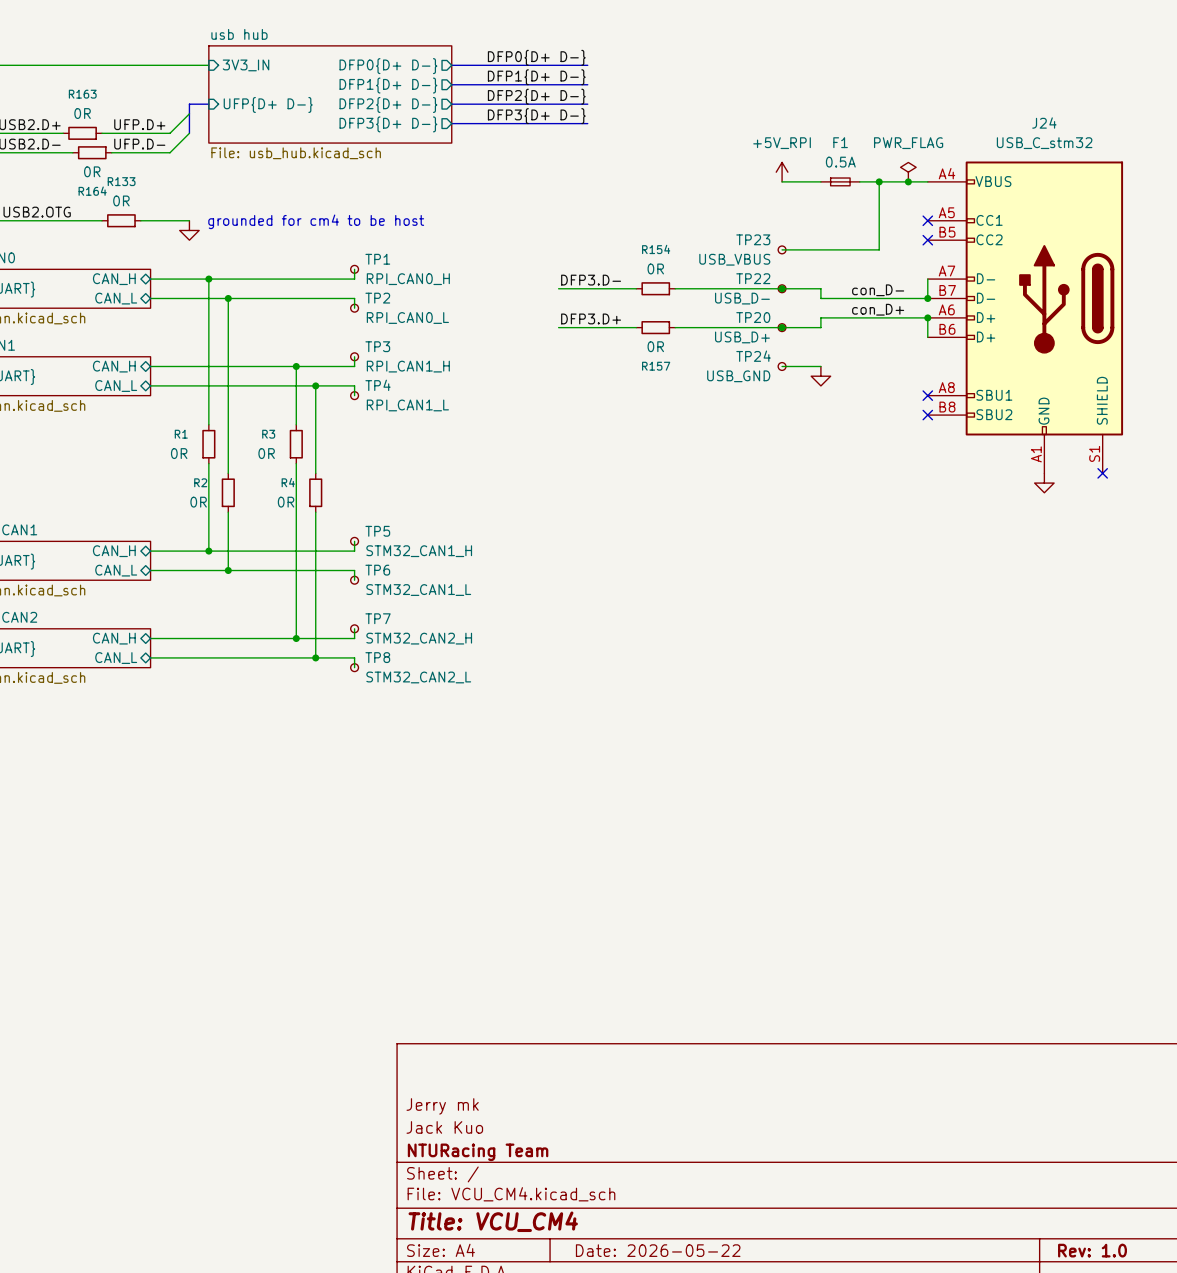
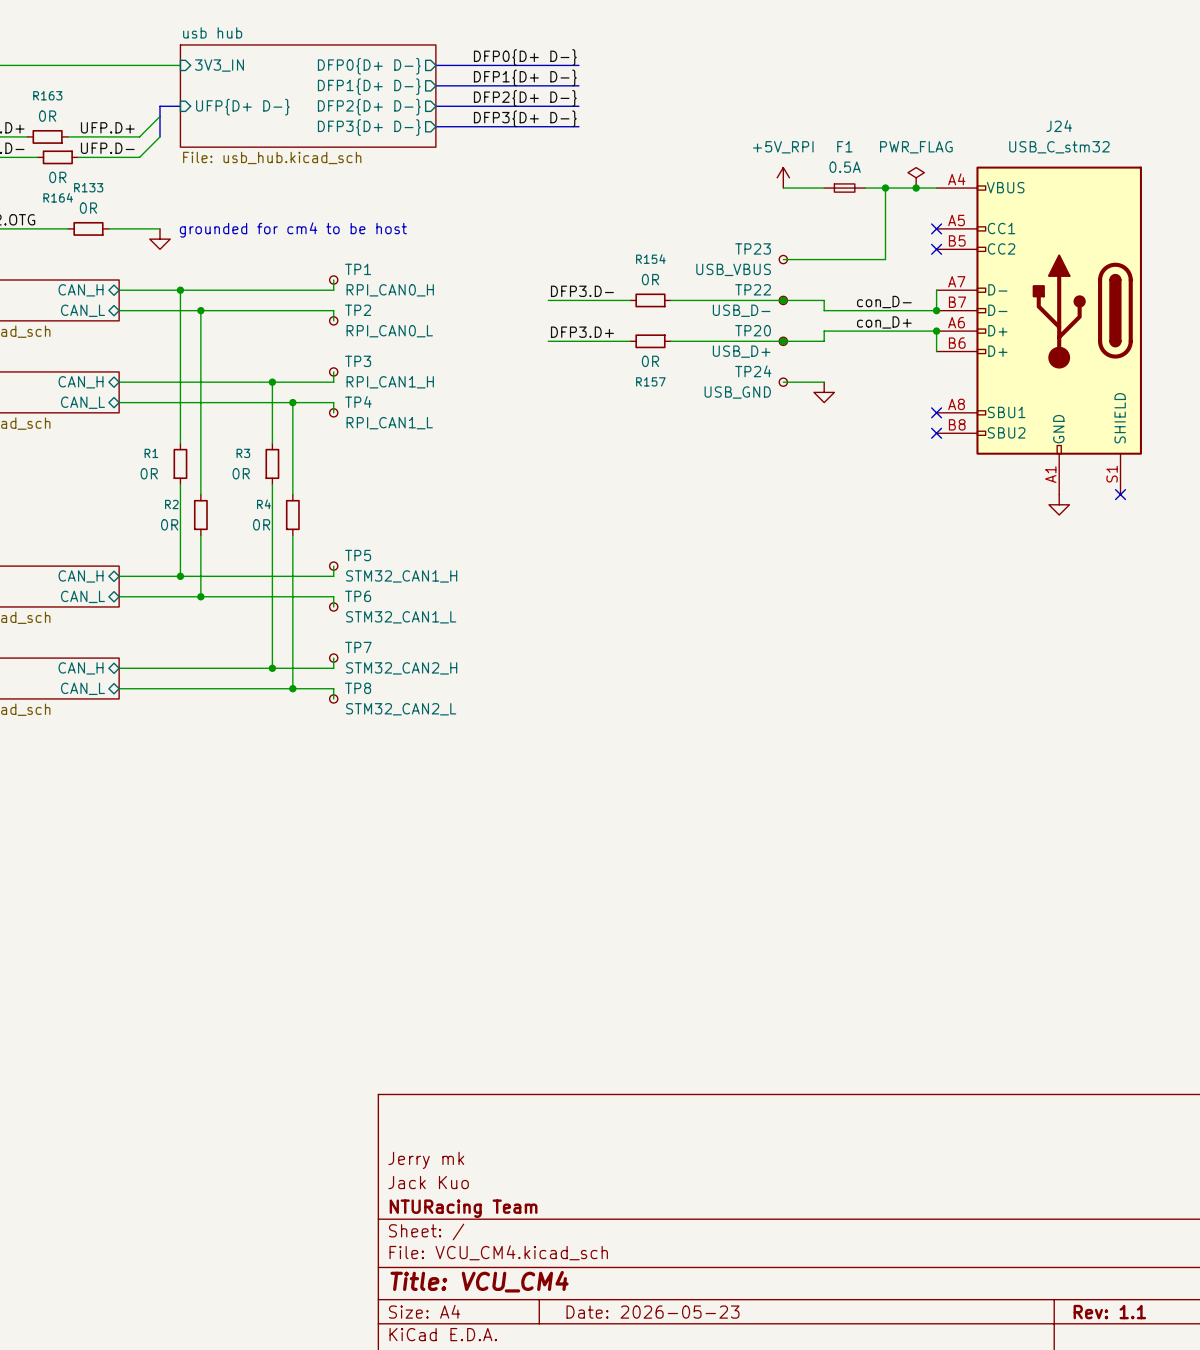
title block: Date: 2026-05-22 (658, 1250) -> Date: 2026-05-23 (653, 1312)
title block: Rev: 1.0 (1092, 1250) -> Rev: 1.1 (1109, 1312)

